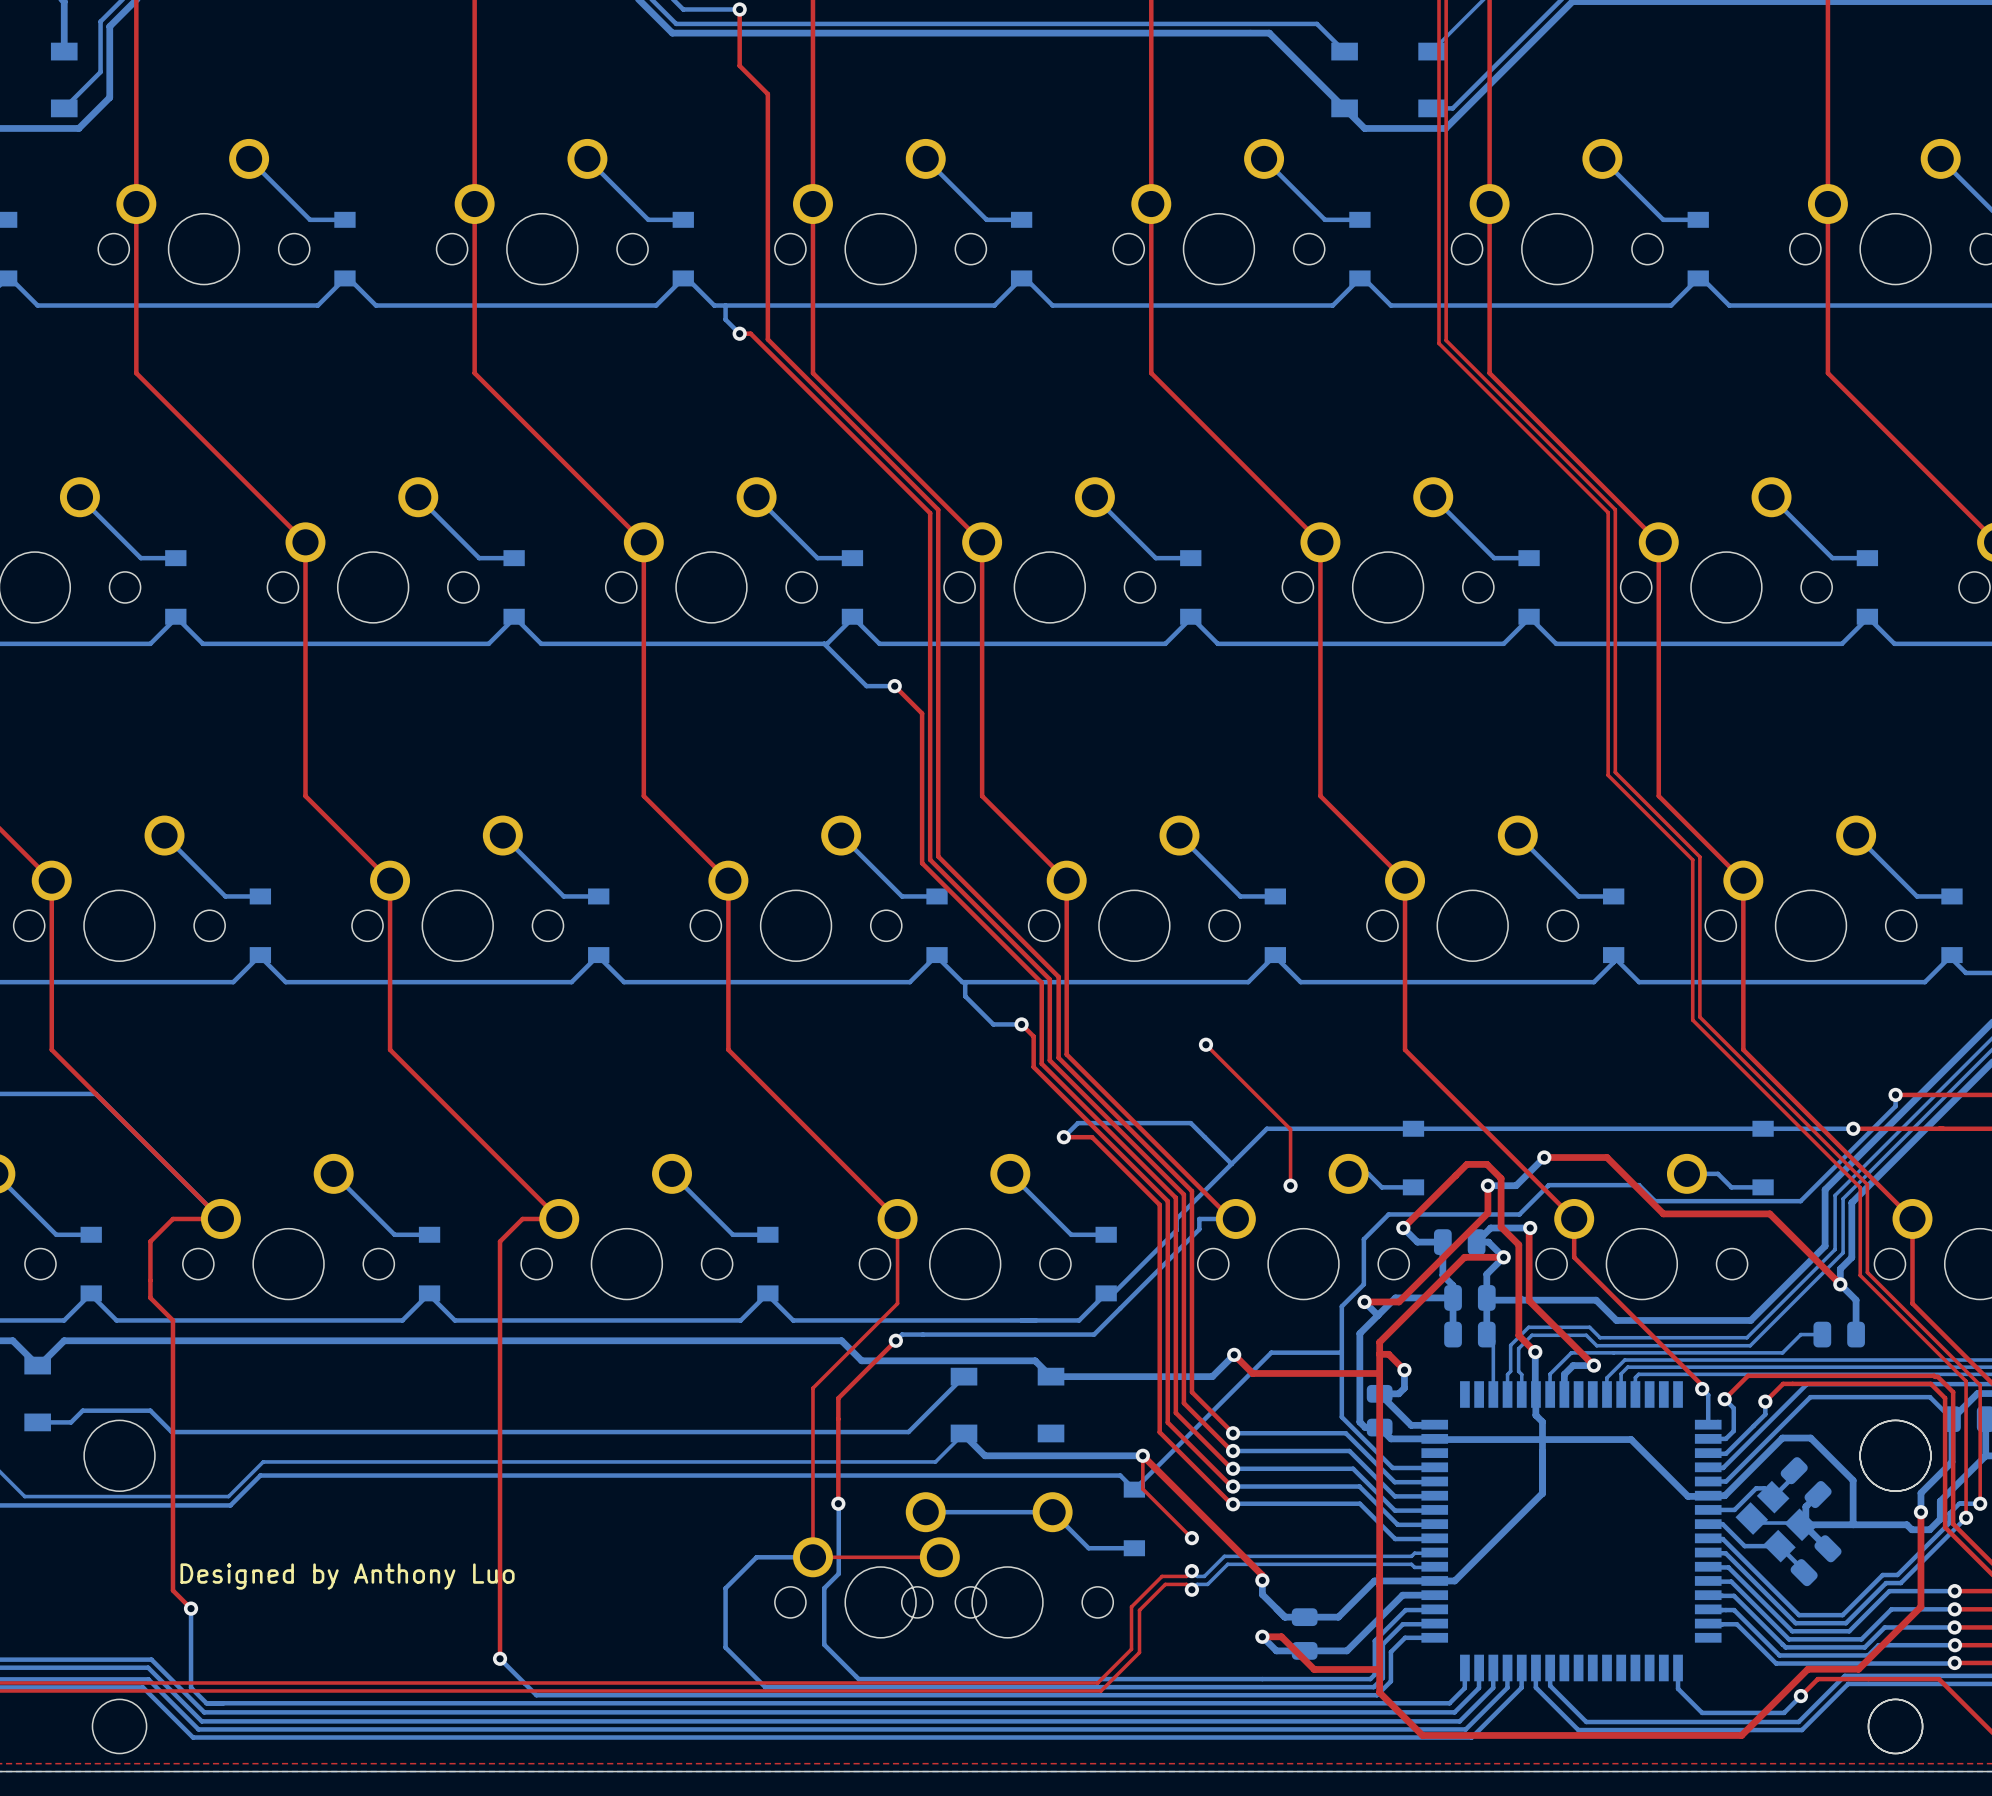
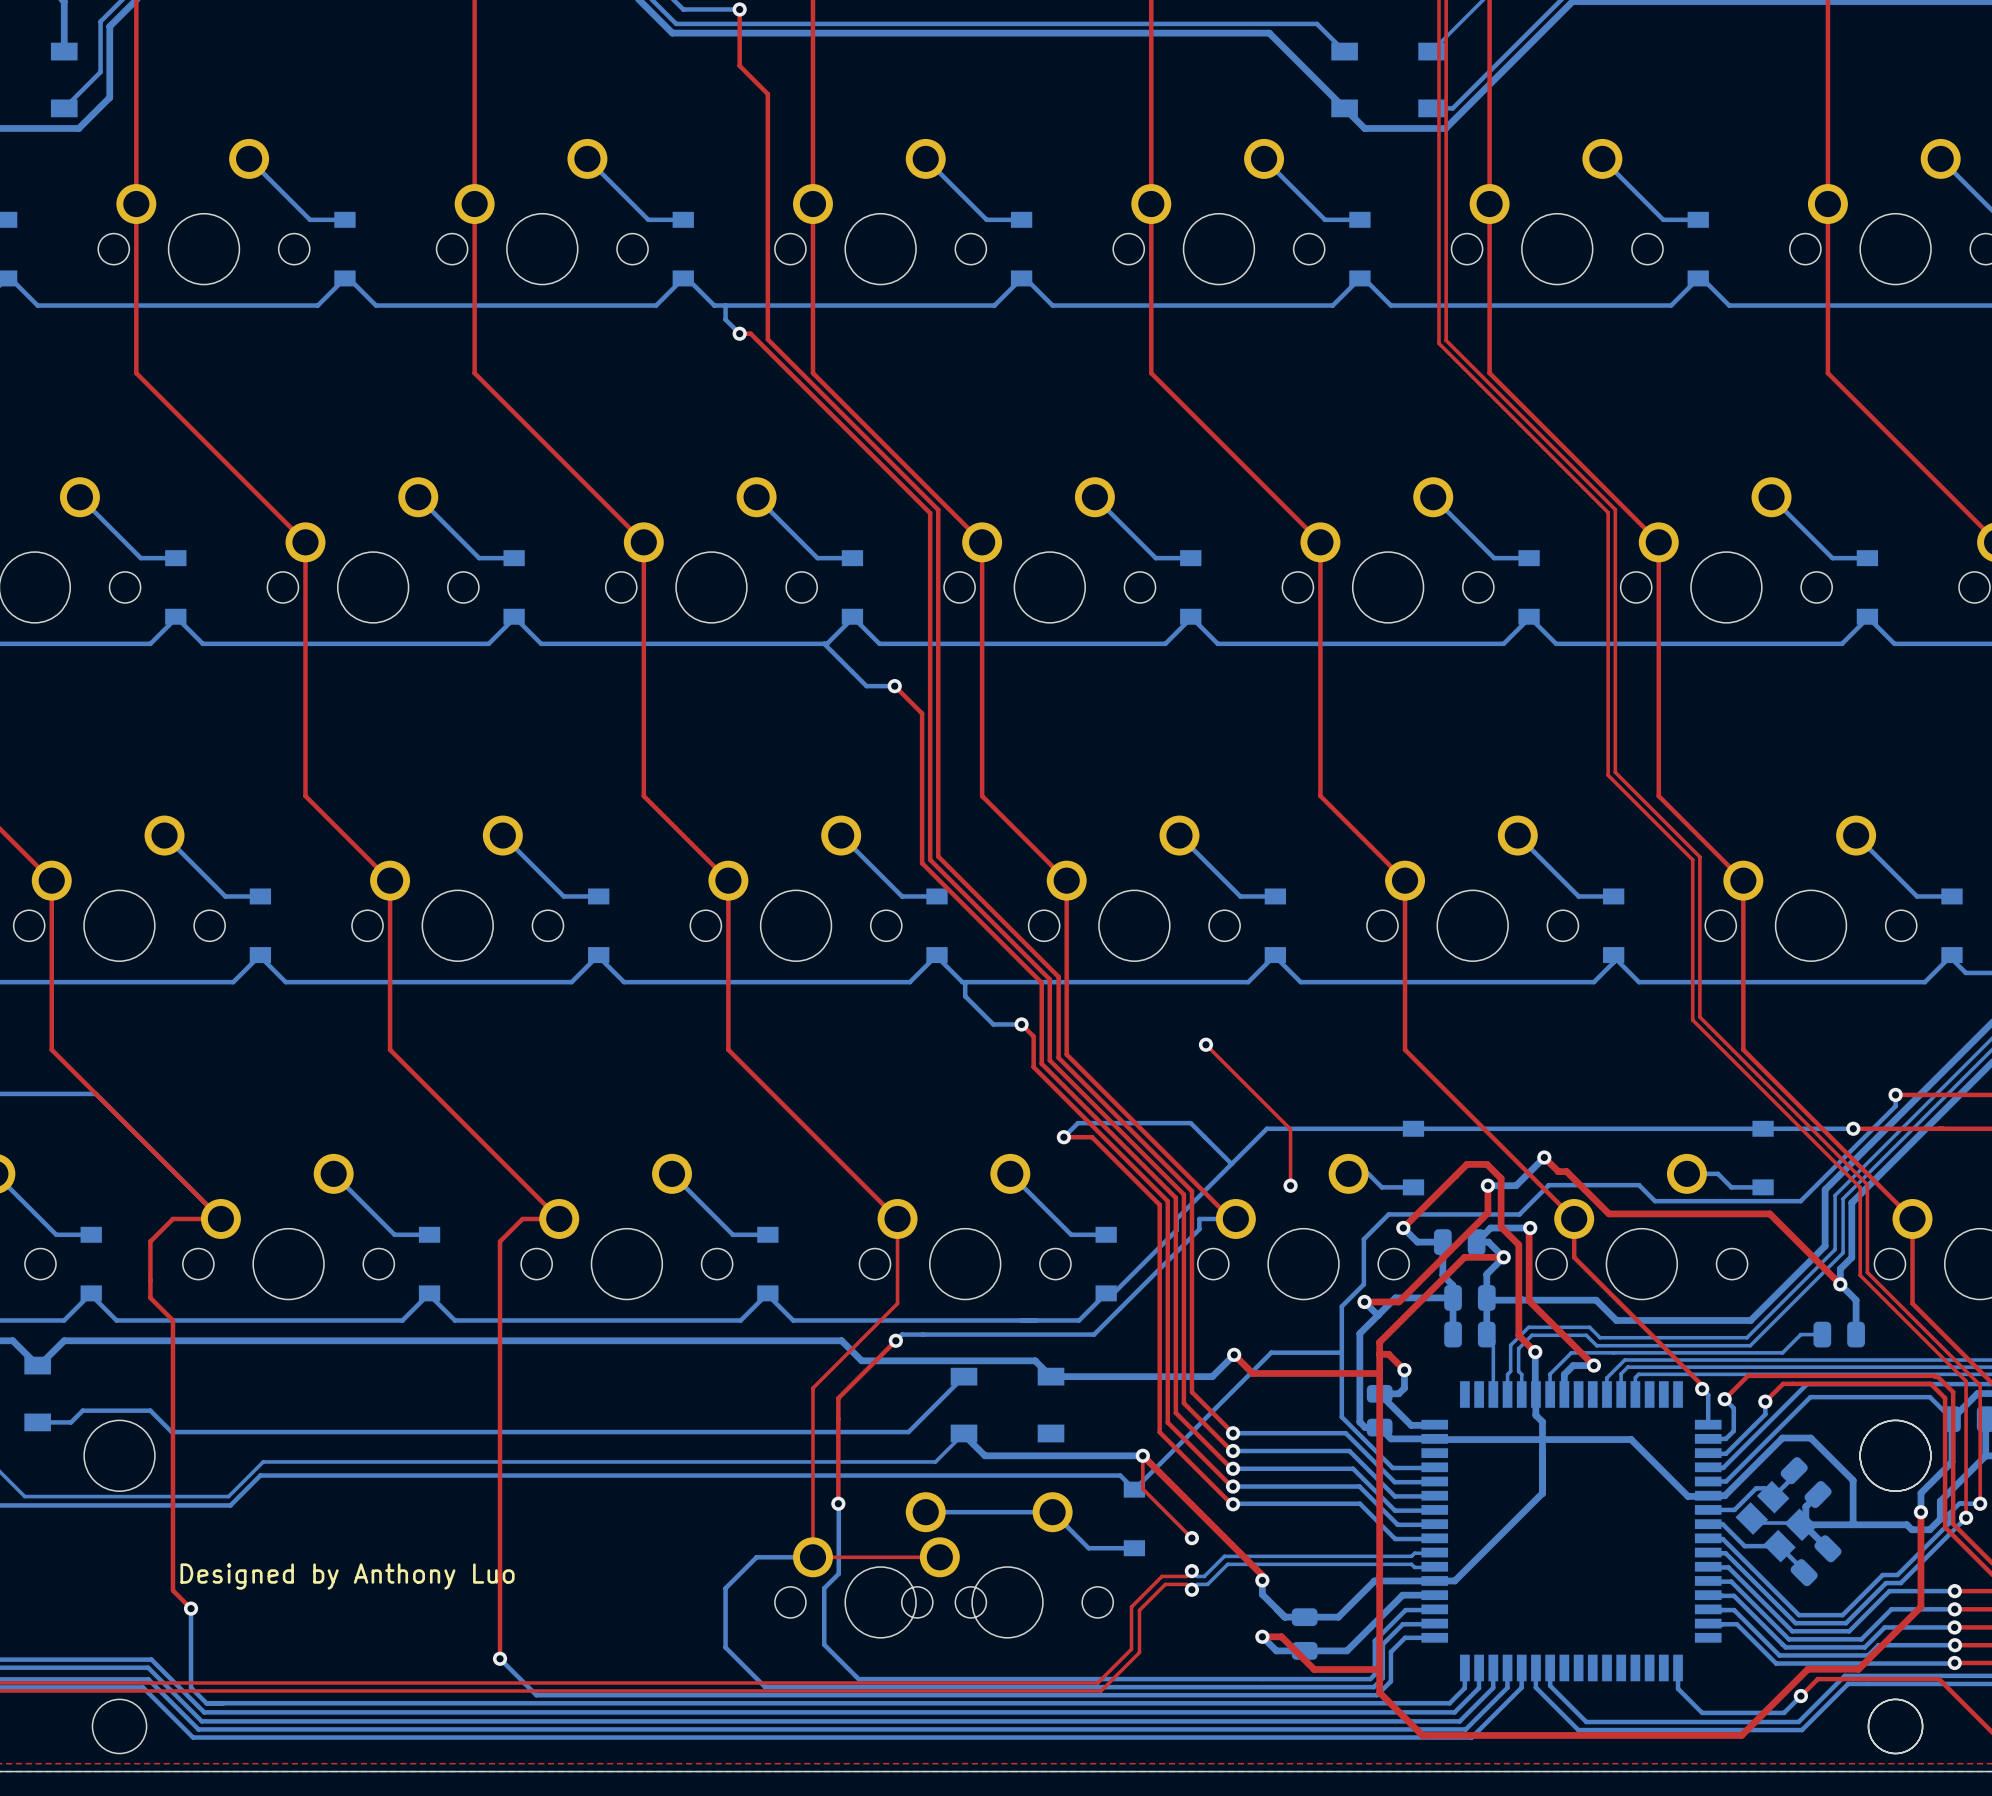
top track: (1544, 1157) (1606, 1157) (1663, 1213) -> (1544, 1157) (1558, 1171) (1566, 1171) (1608, 1213) (1663, 1213)

